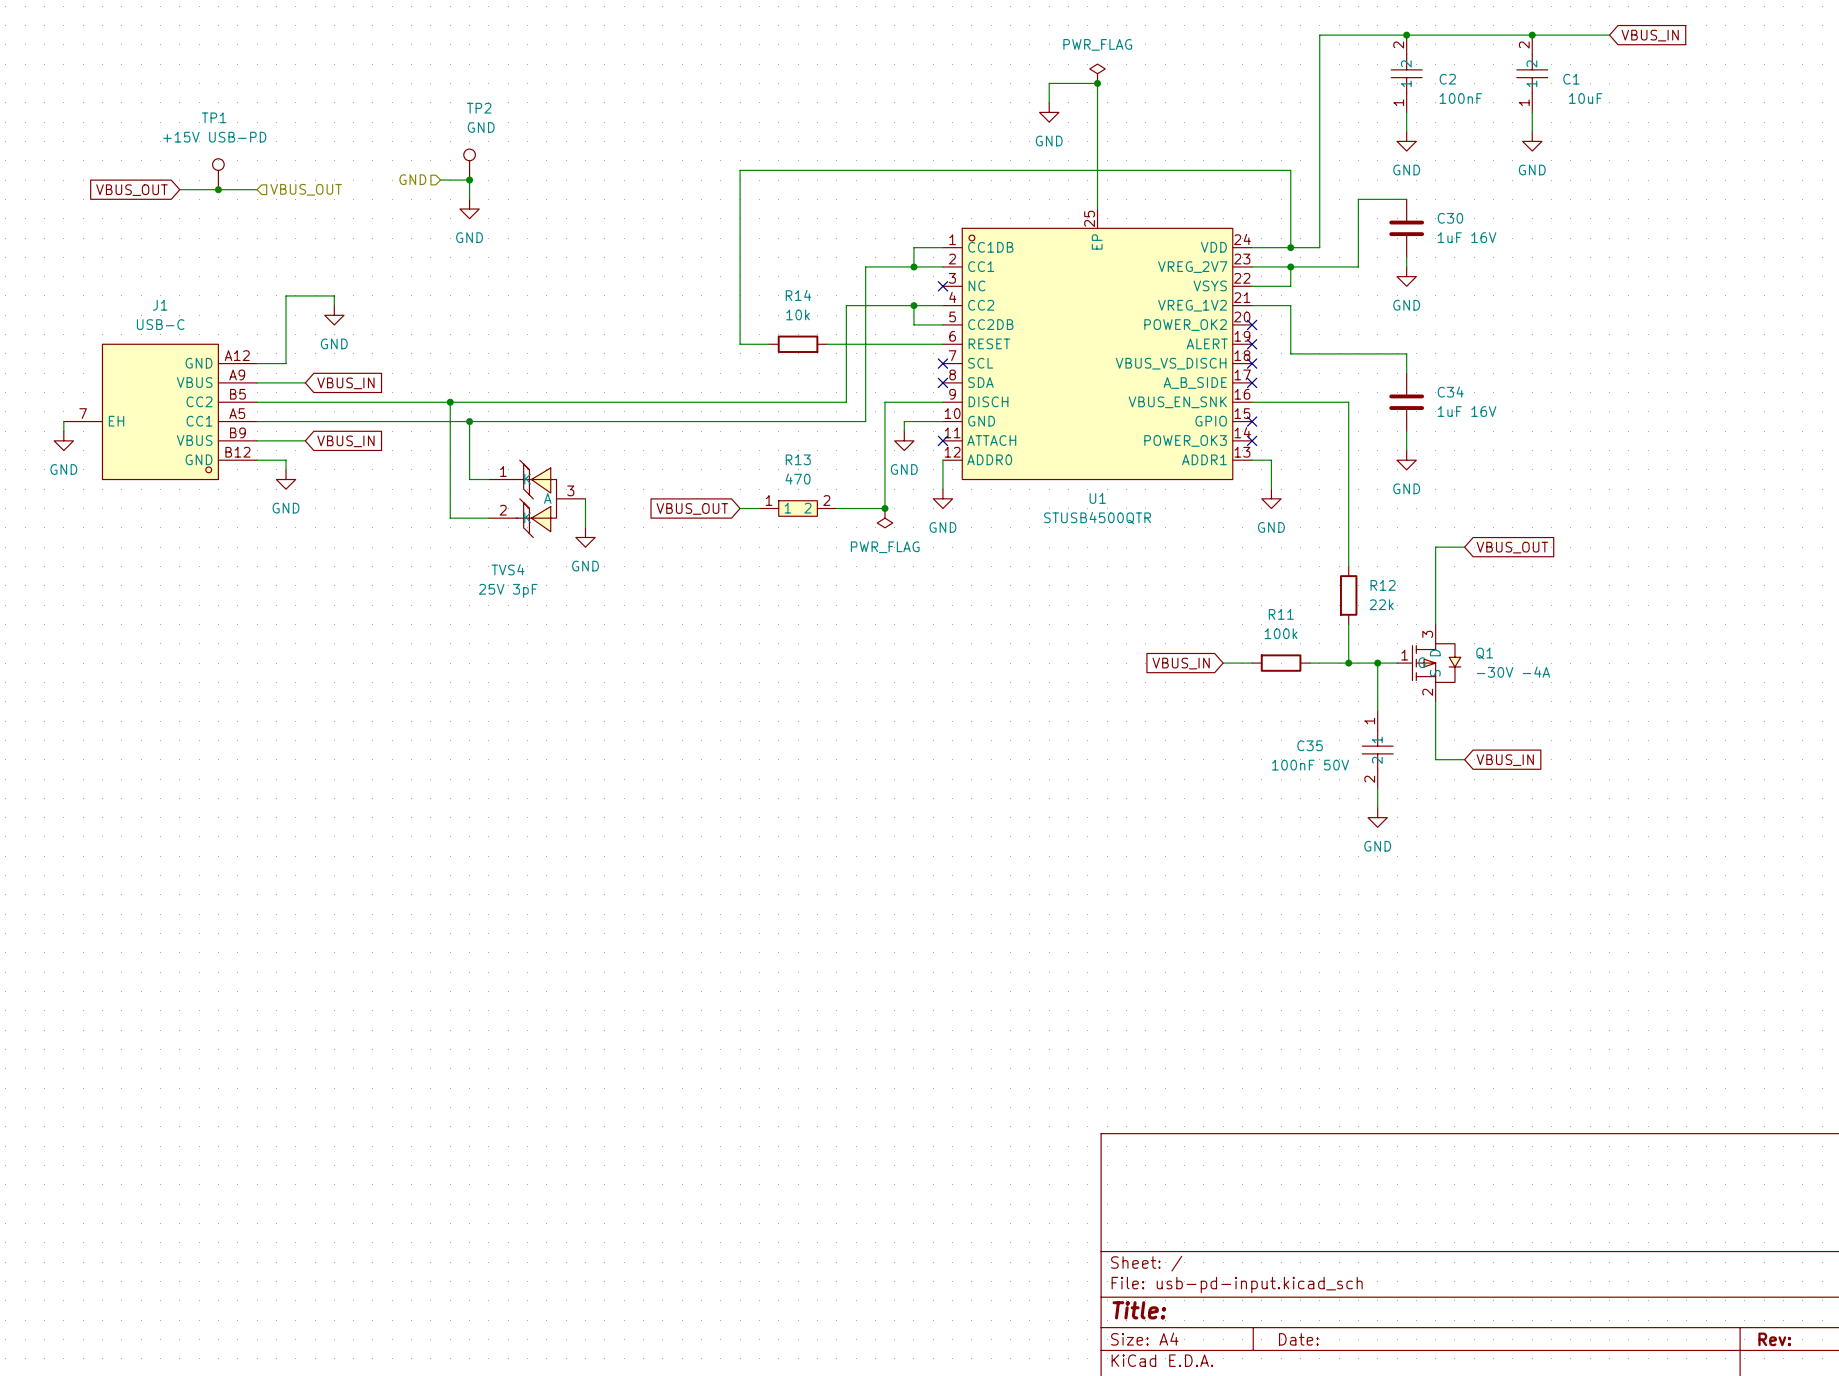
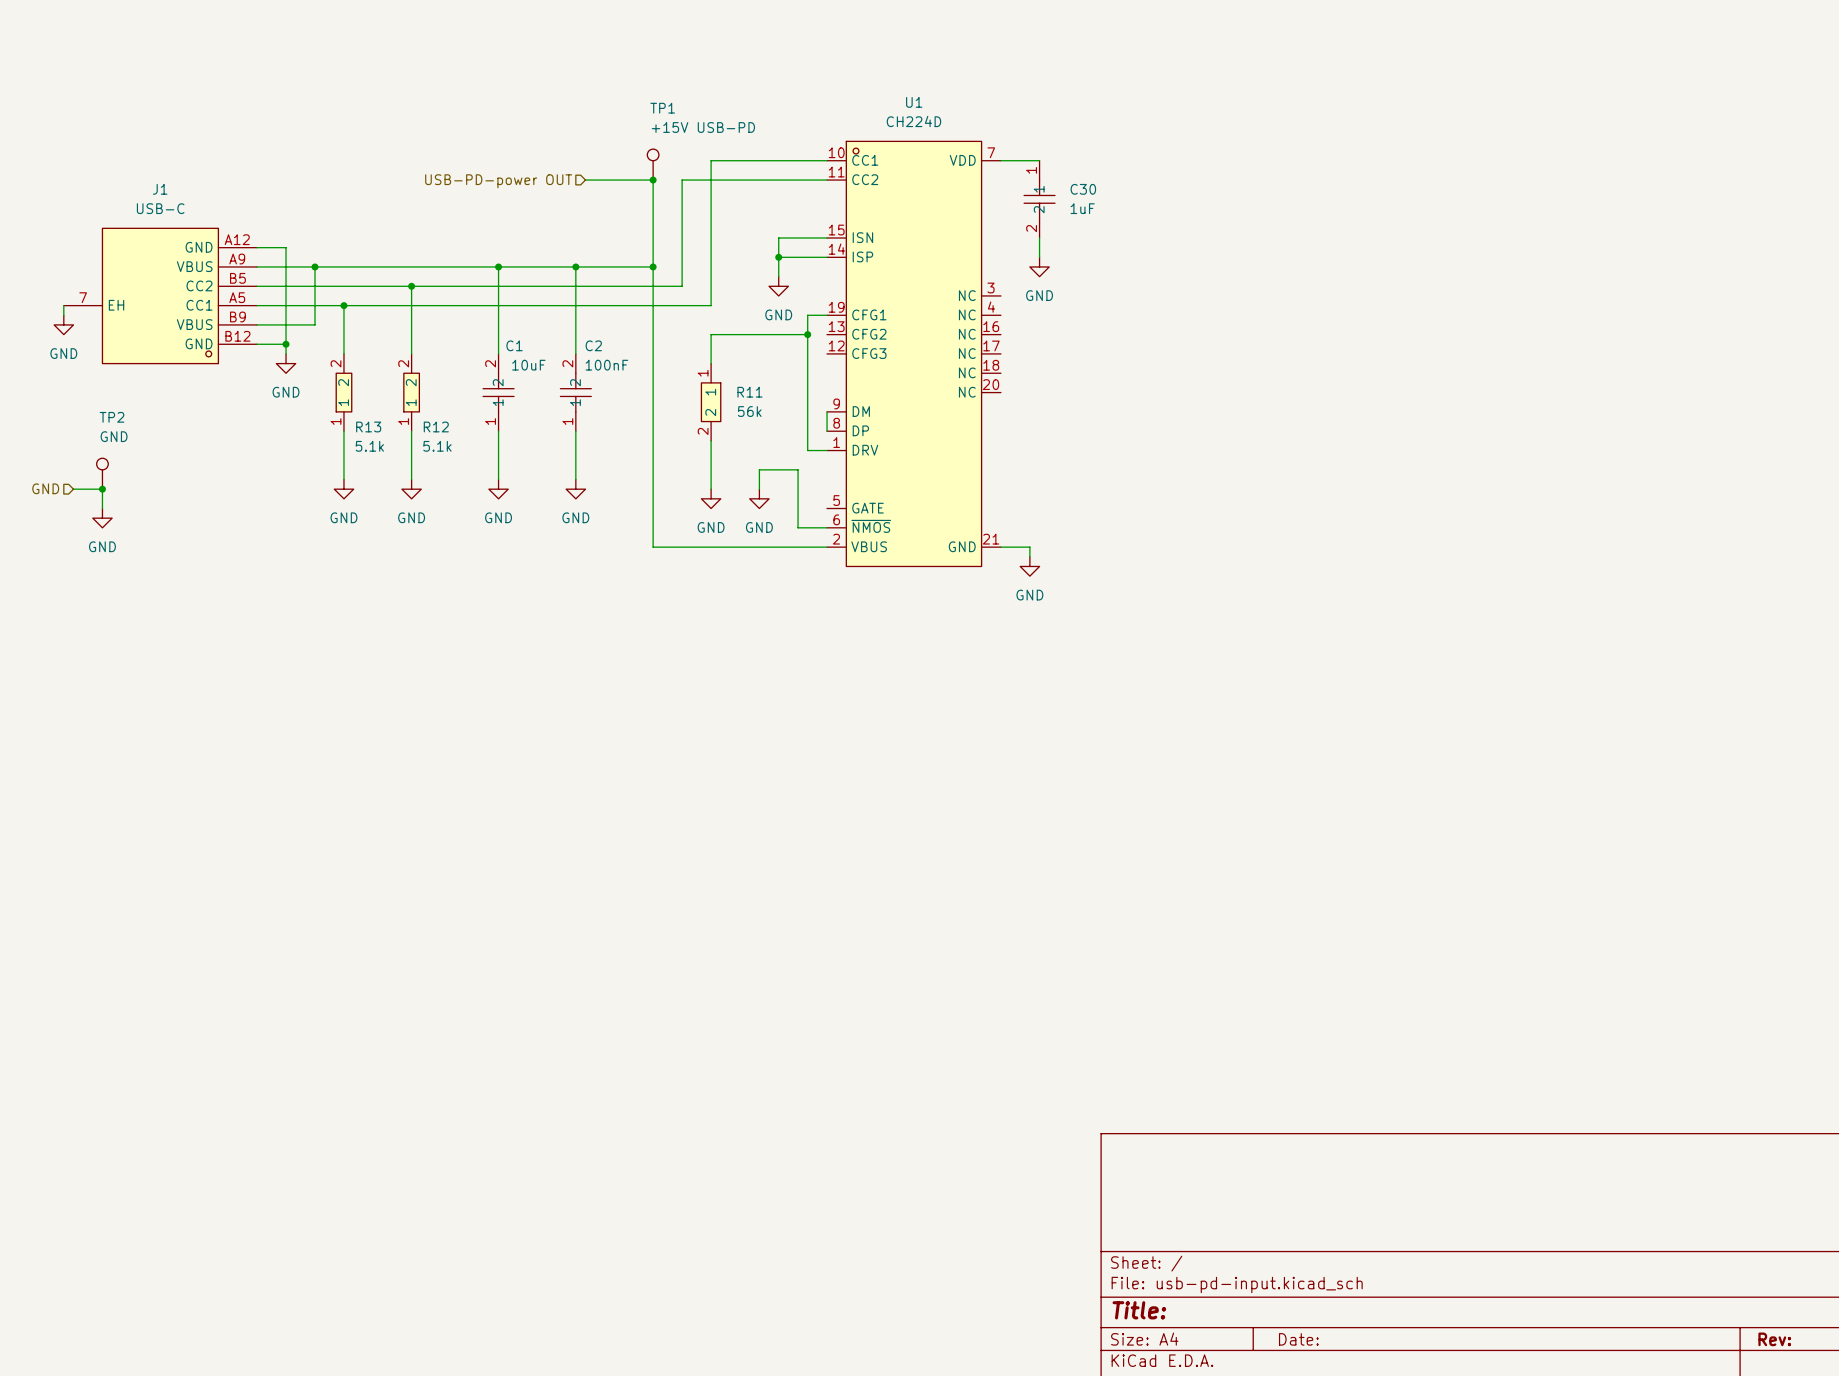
junction: (1406, 35) -> none
junction: (1532, 35) -> none
wire: (1609, 35) (1319, 35) (1319, 247) (1252, 247) -> none
global label: VBUS_IN (1650, 35) -> none
power symbol: PWR_FLAG (1097, 73) -> none
C2 position: (1406, 73) -> (575, 392)
C1 position: (1532, 73) -> (498, 392)
C2 name position: C2 (1447, 79) -> C2 (593, 345)
C1 name position: C1 (1571, 79) -> C1 (514, 345)
junction: (1097, 83) -> none
C2 value position: 100nF (1460, 98) -> 100nF (606, 365)
C1 value position: 10uF (1585, 98) -> 10uF (528, 365)
wire: (1049, 102) (1049, 83) (1097, 83) (1097, 209) -> none
power symbol: GND (1049, 112) -> none
wire: (1406, 112) (1406, 131) -> none
wire: (1532, 112) (1532, 131) -> none
TP1 name position: TP1 (214, 117) -> TP1 (662, 108)
TP1 value position: +15V USB-PD (214, 137) -> +15V USB-PD (703, 127)
power symbol: GND (1406, 141) -> none
power symbol: GND (1532, 141) -> none
wire: none -> (827, 160) (711, 160) (711, 305) (257, 305)
wire: none -> (1000, 160) (1039, 160)
TP2 position: (469, 164) -> (102, 473)
TP1 position: (218, 174) -> (653, 164)
hierarchical label: GND (412, 179) -> none
wire: (440, 180) (469, 180) (469, 199) -> none
junction: (469, 180) -> none
wire: none -> (585, 180) (653, 180) (653, 547) (827, 547)
junction: none -> (653, 180)
wire: none -> (827, 180) (682, 180) (682, 286) (257, 286)
hierarchical label: none -> USB-PD-power OUT (498, 181)
wire: (179, 189) (257, 189) -> none
junction: (218, 189) -> none
hierarchical label: VBUS_OUT (306, 189) -> none
global label: VBUS_OUT (132, 190) -> none
C30 symbol: [1389, 199, 1425, 258] -> [1024, 160, 1056, 239]
wire: (1406, 199) (1358, 199) (1358, 266) (1252, 266) -> none
power symbol: GND (469, 209) -> none
U1 symbol: [942, 209, 1253, 480] -> [827, 141, 1001, 567]
C30 value: 1uF 16V (1467, 237) -> 1uF (1082, 208)
wire: none -> (827, 238) (778, 238) (778, 276)
wire: (1290, 247) (1290, 170) (740, 170) (740, 344) (769, 344) -> none
junction: (1290, 247) -> none
wire: none -> (778, 257) (827, 257)
junction: none -> (778, 257)
wire: (1406, 257) (1406, 266) -> none
wire: none -> (257, 266) (653, 266)
wire: none -> (315, 266) (315, 324) (257, 324)
junction: none -> (315, 266)
wire: none -> (498, 266) (498, 353)
junction: none -> (498, 266)
wire: none -> (575, 266) (575, 353)
junction: none -> (575, 266)
junction: none -> (653, 266)
junction: (913, 266) -> none
wire: (942, 266) (865, 266) (865, 421) (257, 421) -> none
power symbol: none -> GND (1039, 266)
wire: (1290, 266) (1290, 286) (1252, 286) -> none
junction: (1290, 266) -> none
power symbol: GND (1406, 276) -> none
wire: none -> (411, 286) (411, 353)
junction: none -> (411, 286)
power symbol: none -> GND (778, 286)
no-connect mark: (942, 286) -> none
wire: (286, 295) (334, 295) (334, 305) -> (286, 295) (286, 247) (257, 247)
wire: none -> (343, 305) (343, 353)
junction: none -> (343, 305)
junction: (913, 305) -> none
wire: (942, 305) (846, 305) (846, 402) (257, 402) -> none
wire: (1252, 305) (1290, 305) (1290, 353) (1406, 353) (1406, 373) -> none
power symbol: GND (334, 315) -> none
wire: none -> (827, 315) (807, 315) (807, 450) (827, 450)
power symbol: none -> GND (63, 324)
no-connect mark: (1252, 324) -> none
wire: none -> (807, 334) (711, 334) (711, 363)
junction: none -> (807, 334)
wire: none -> (257, 344) (286, 344)
junction: none -> (286, 344)
R14: 10k (798, 344) -> none
no-connect mark: (1252, 344) -> none
wire: (286, 353) (286, 363) (257, 363) -> none
power symbol: none -> GND (286, 363)
no-connect mark: (942, 363) -> none
no-connect mark: (1252, 363) -> none
wire: (257, 382) (305, 382) -> none
no-connect mark: (942, 382) -> none
no-connect mark: (1252, 382) -> none
global label: VBUS_IN (345, 383) -> none
wire: (450, 402) (450, 518) (488, 518) -> none
junction: (450, 402) -> none
wire: (1252, 402) (1348, 402) (1348, 566) -> none
C34: 1uF 16V (1406, 402) -> none
J1 position: (160, 411) -> (160, 295)
wire: none -> (827, 411) (827, 431)
wire: (63, 421) (63, 431) -> (63, 305) (63, 315)
wire: (469, 421) (469, 479) (488, 479) -> none
junction: (469, 421) -> none
no-connect mark: (1252, 421) -> none
wire: none -> (343, 431) (343, 479)
wire: none -> (411, 431) (411, 479)
wire: none -> (498, 431) (498, 479)
wire: none -> (575, 431) (575, 479)
wire: (1406, 431) (1406, 450) -> none
power symbol: GND (63, 440) -> none
wire: (257, 440) (305, 440) -> none
wire: none -> (711, 440) (711, 489)
power symbol: GND (904, 440) -> none
no-connect mark: (942, 440) -> none
no-connect mark: (1252, 440) -> none
global label: VBUS_IN (345, 441) -> none
R13 name position: R13 (798, 459) -> R13 (368, 426)
wire: (257, 460) (286, 460) (286, 469) -> none
wire: (1252, 460) (1271, 460) (1271, 489) -> none
power symbol: GND (1406, 460) -> none
R13 value: 470 (798, 478) -> 5.1k (369, 446)
power symbol: GND (286, 479) -> none
hierarchical label: none -> GND (45, 488)
wire: none -> (73, 489) (102, 489) (102, 508)
junction: none -> (102, 489)
power symbol: none -> GND (343, 489)
power symbol: none -> GND (411, 489)
power symbol: none -> GND (498, 489)
wire: none -> (759, 489) (759, 469) (798, 469) (798, 527) (827, 527)
TVS4: 25V 3pF (537, 498) -> none
wire: (585, 498) (585, 527) -> none
power symbol: none -> GND (711, 498)
power symbol: none -> GND (759, 498)
power symbol: GND (942, 498) -> none
U1 name position: U1 (1097, 498) -> U1 (914, 102)
power symbol: GND (1271, 498) -> none
global label: VBUS_OUT (692, 508) -> none
wire: (740, 508) (759, 508) -> none
R13 rotation: 0° (798, 508) -> 90° counterclockwise (343, 392)
R13 position: (798, 508) -> (343, 392)
junction: (884, 508) -> none
power symbol: none -> GND (102, 518)
power symbol: PWR_FLAG (884, 518) -> none
U1 value: STUSB4500QTR (1097, 518) -> CH224D (913, 121)
power symbol position: GND (585, 537) -> GND (575, 489)
wire: none -> (1000, 547) (1029, 547) (1029, 556)
wire: (1464, 547) (1435, 547) (1435, 624) -> none
global label: VBUS_OUT (1512, 547) -> none
power symbol: none -> GND (1029, 566)
R12 symbol: [1340, 566, 1358, 625] -> [403, 353, 420, 432]
R12 name position: R12 (1383, 585) -> R12 (436, 426)
R12 value: 22k (1381, 604) -> 5.1k (437, 446)
R11 name position: R11 (1281, 614) -> R11 (749, 392)
wire: (1348, 624) (1348, 663) -> none
R11 value: 100k (1281, 633) -> 56k (749, 411)
R11 symbol: [1252, 654, 1311, 672] -> [701, 363, 721, 441]
global label: VBUS_IN (1181, 663) -> none
wire: (1223, 663) (1252, 663) -> none
wire: (1310, 663) (1397, 663) -> none
junction: (1348, 663) -> none
wire: (1377, 663) (1377, 711) -> none
junction: (1377, 663) -> none
Q1: -30V -4A (1428, 663) -> none
wire: (1435, 701) (1435, 759) (1464, 759) -> none
C35: 100nF 50V (1377, 750) -> none
global label: VBUS_IN (1505, 760) -> none
wire: (1377, 788) (1377, 807) -> none
power symbol: GND (1377, 817) -> none

